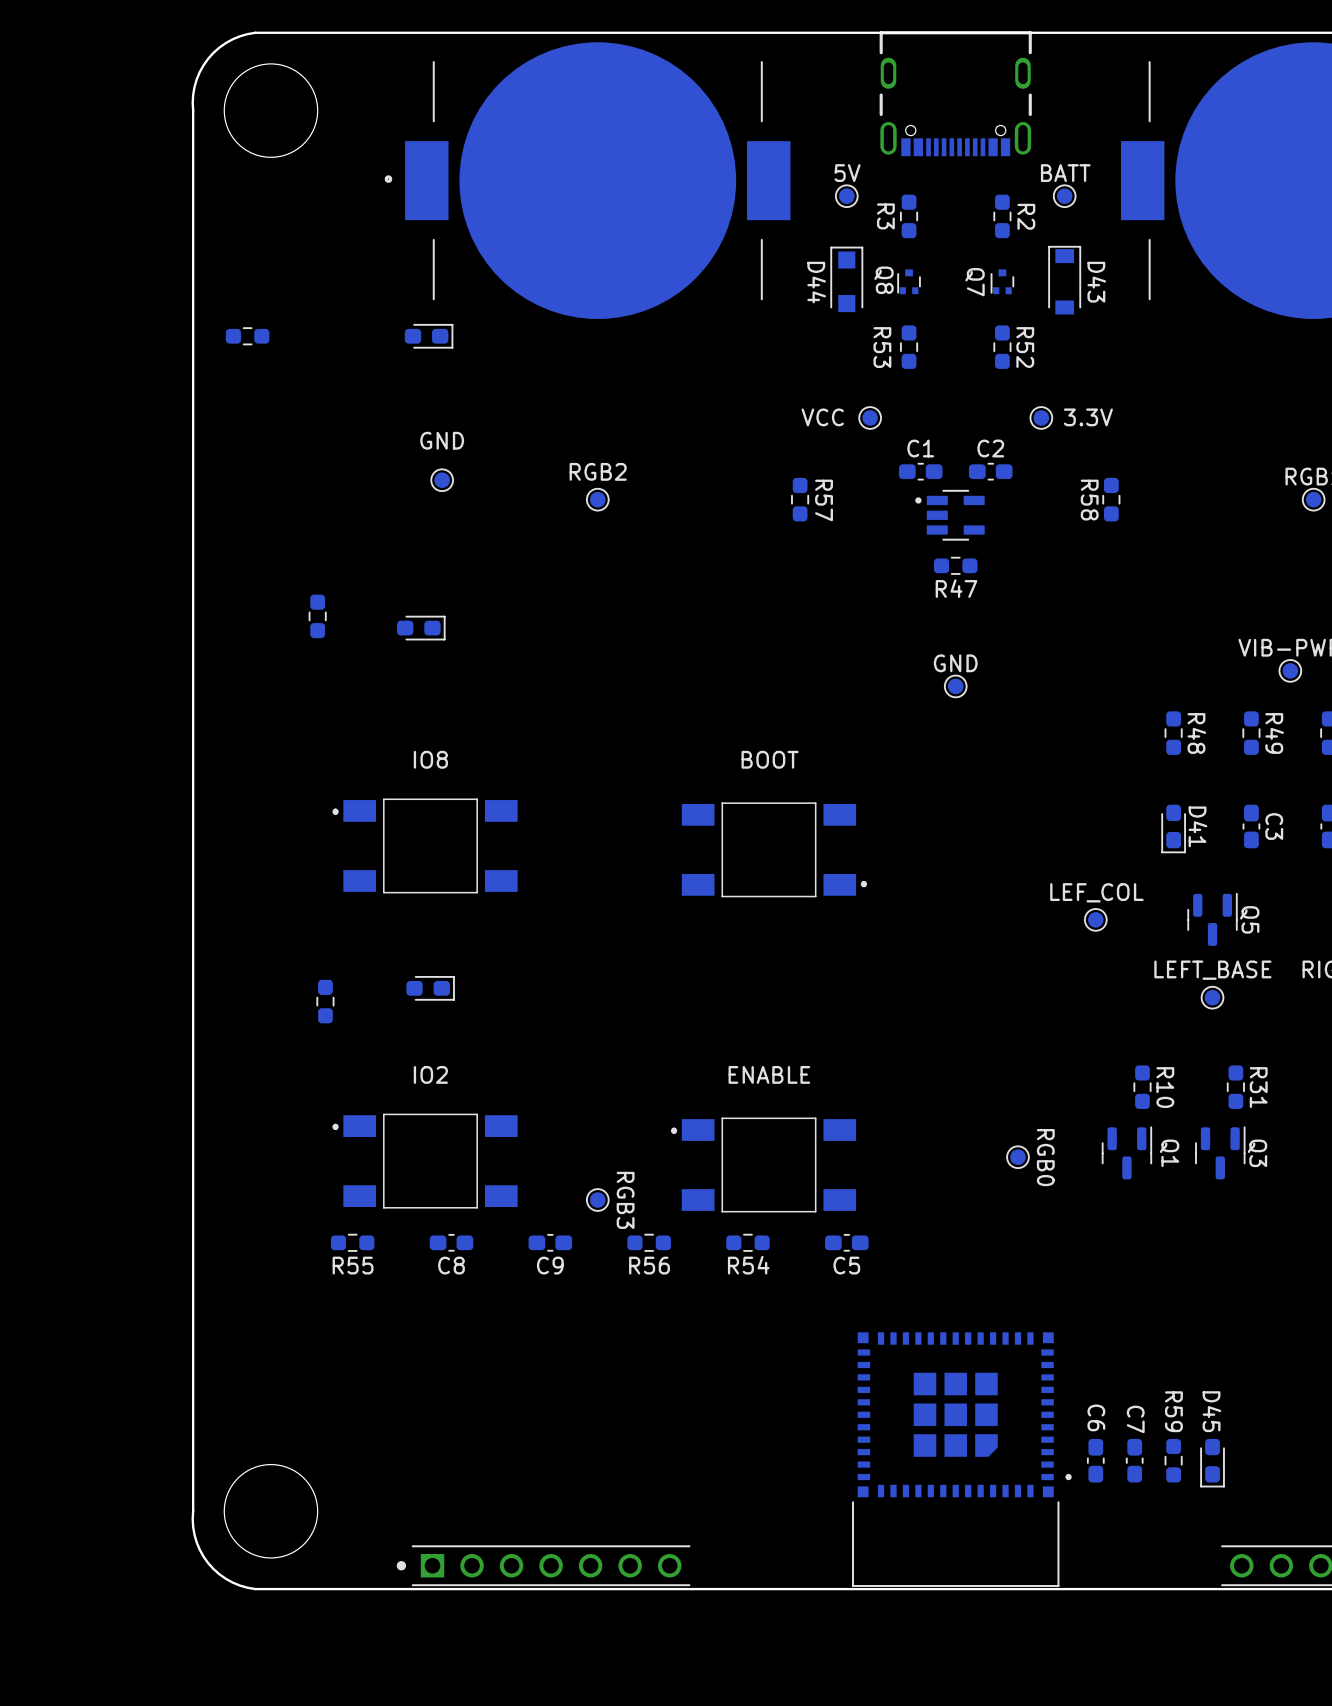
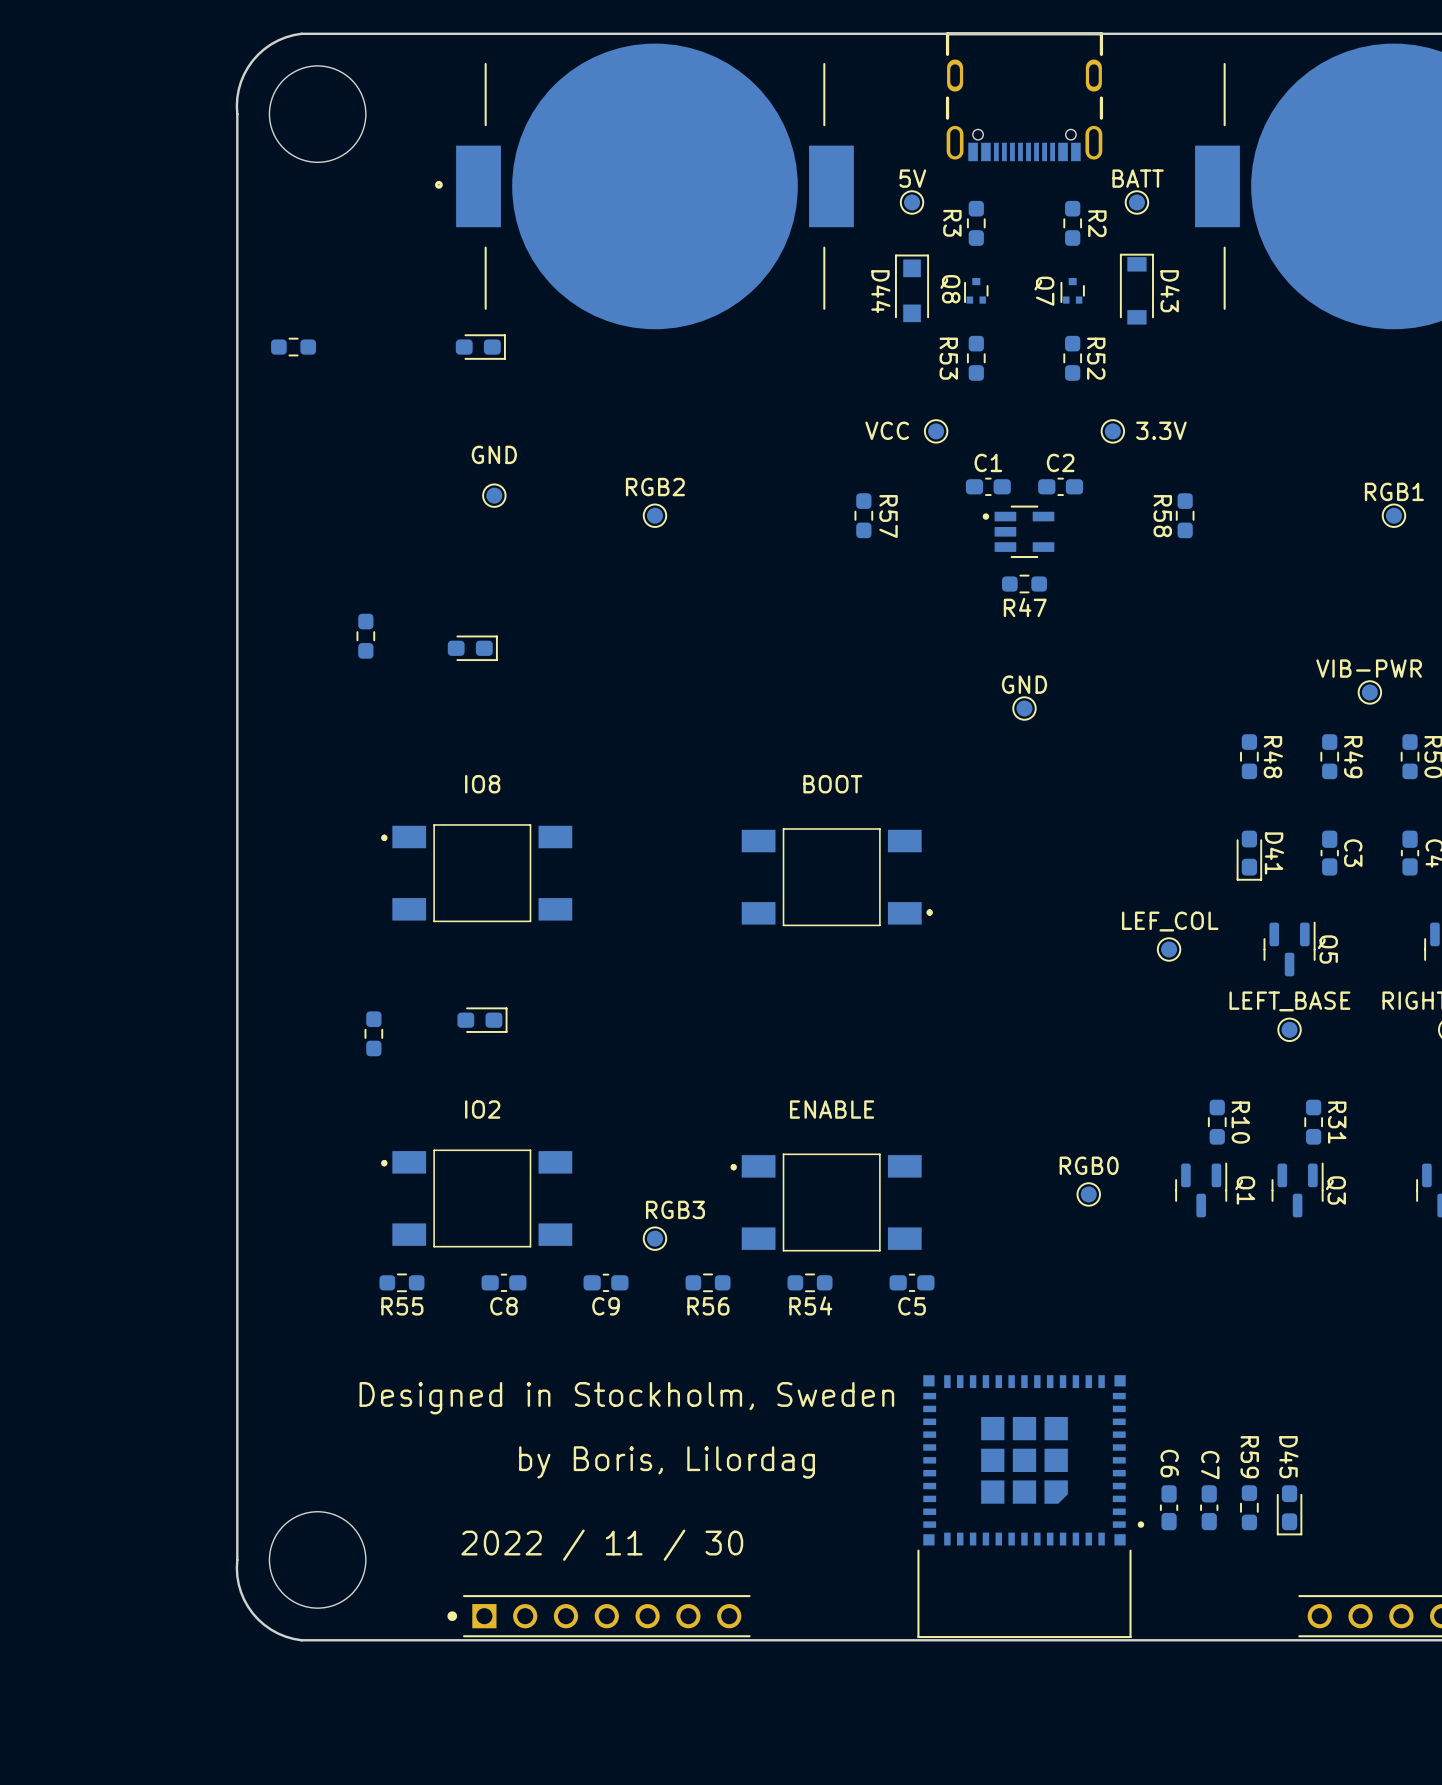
RGB0 name rotation: 0° (1045, 1157) -> 90° counterclockwise (1089, 1165)
RGB3 name rotation: 0° (625, 1200) -> 90° counterclockwise (675, 1209)
text: none -> Designed in Stockholm, Sweden (626, 1398)
text: none -> by Boris, Lilordag (667, 1462)
text: none -> 2022 / 11 / 30 (602, 1545)

